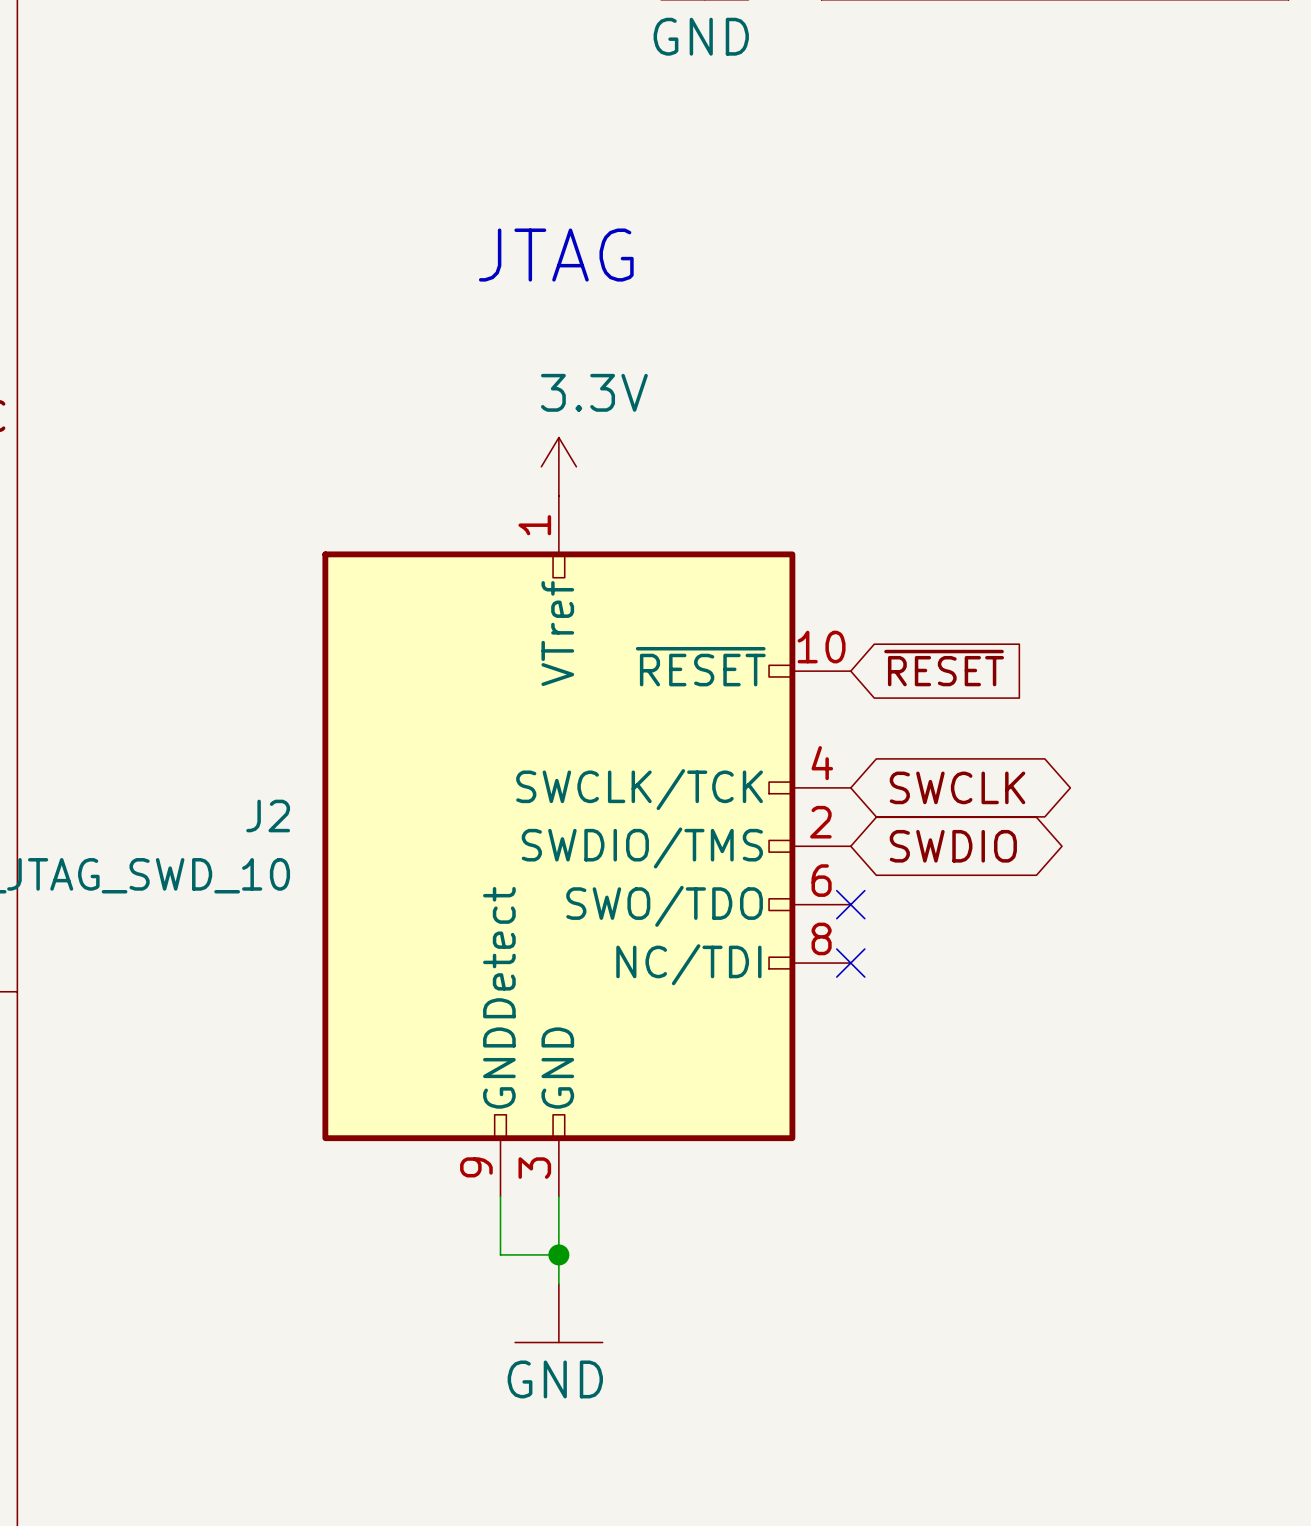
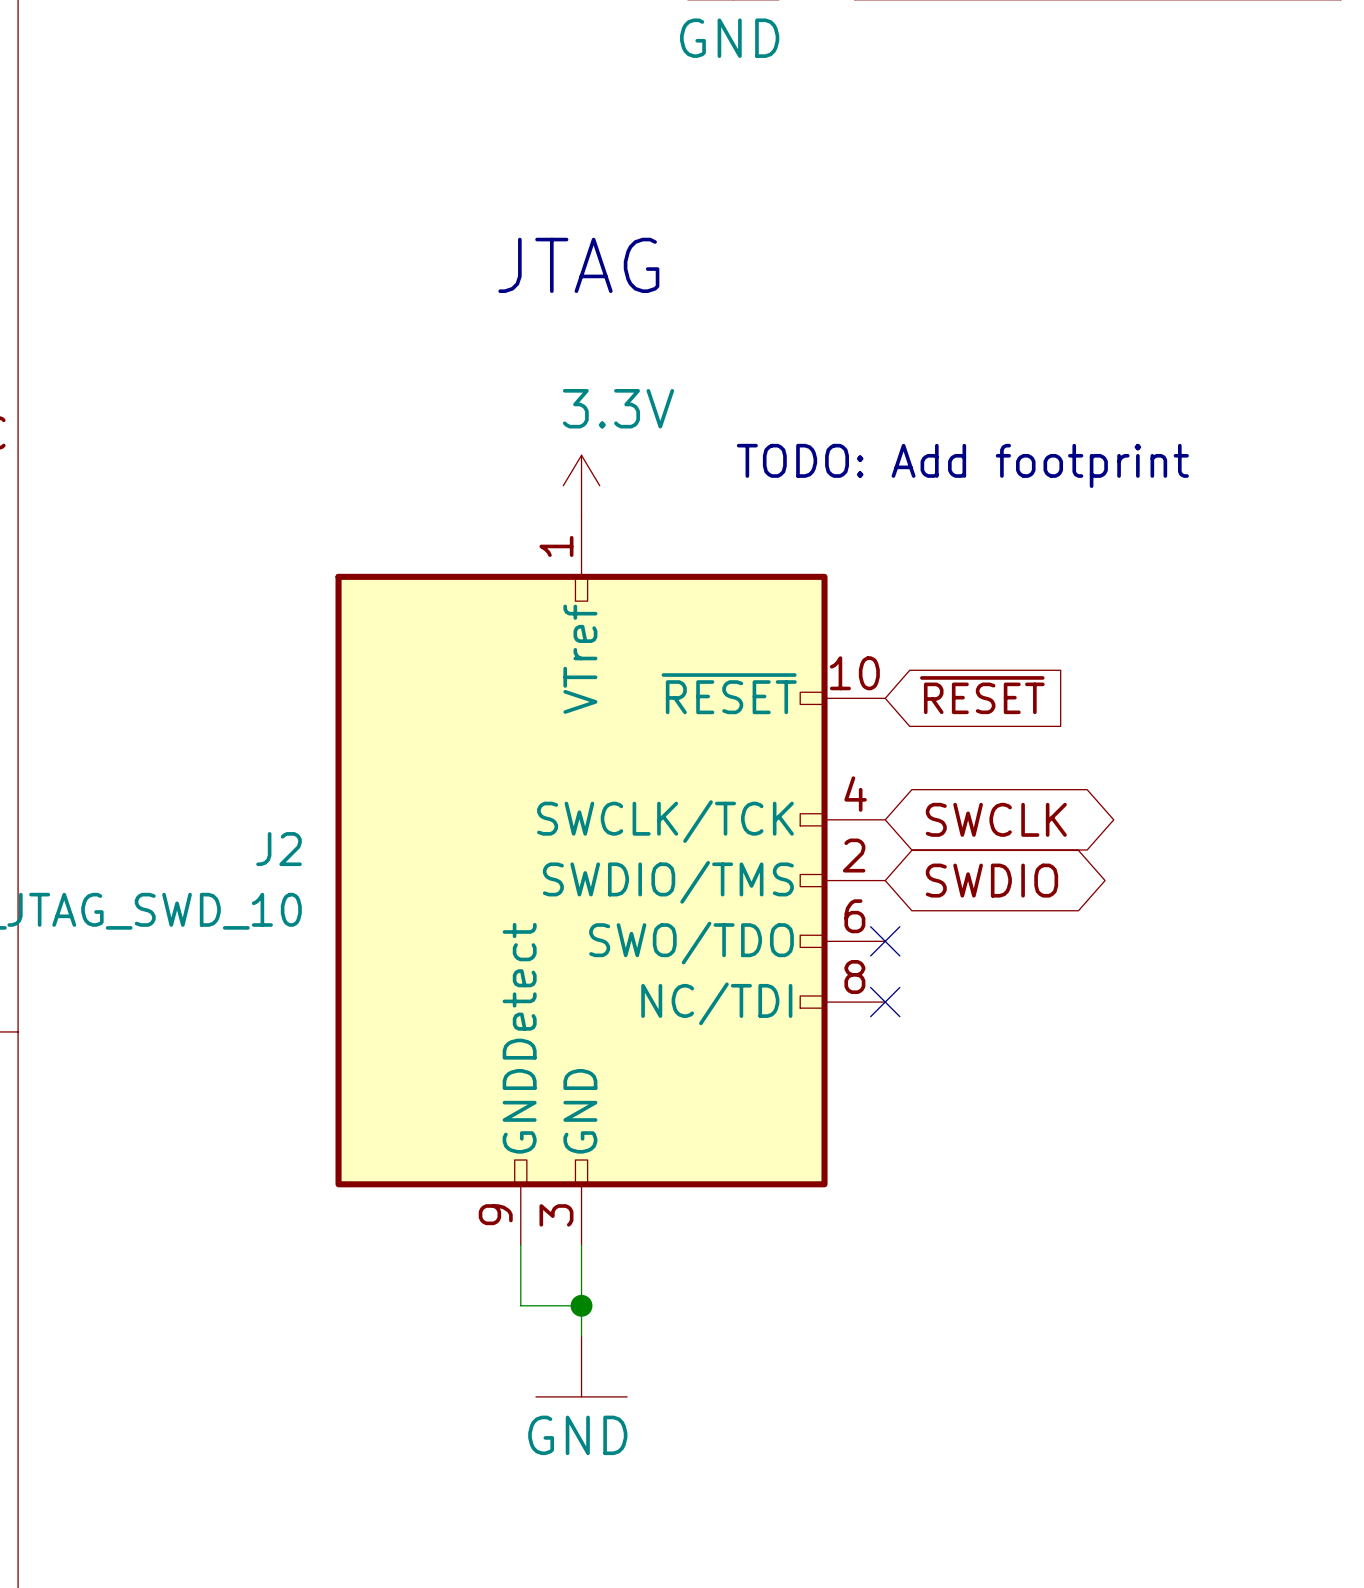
text: none -> TODO: Add footprint (962, 465)

